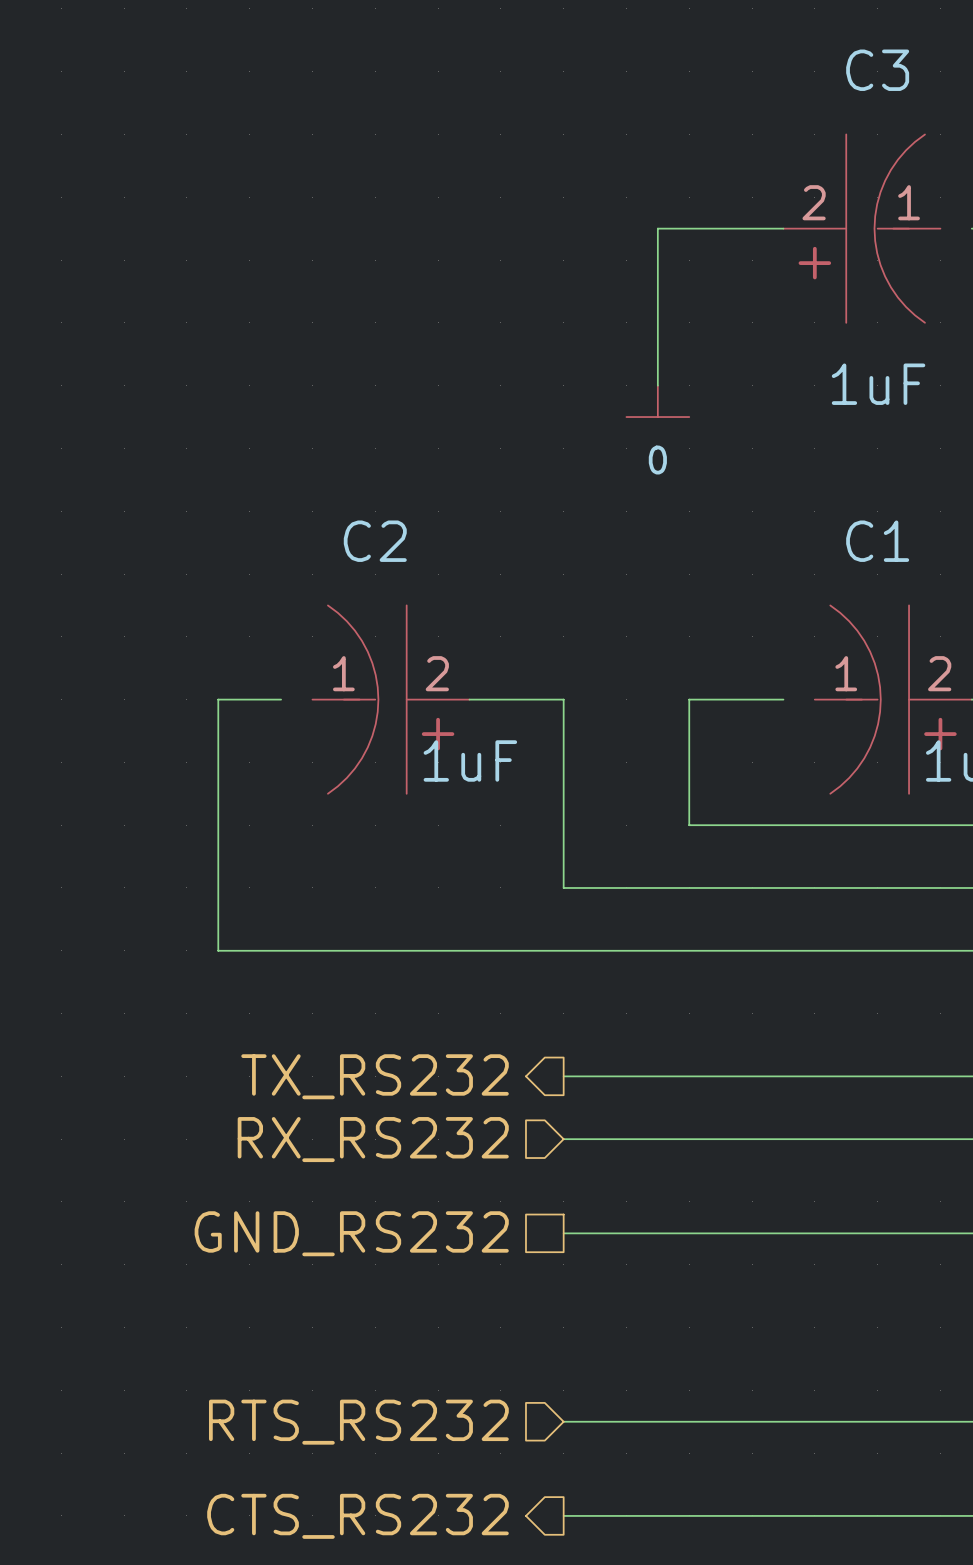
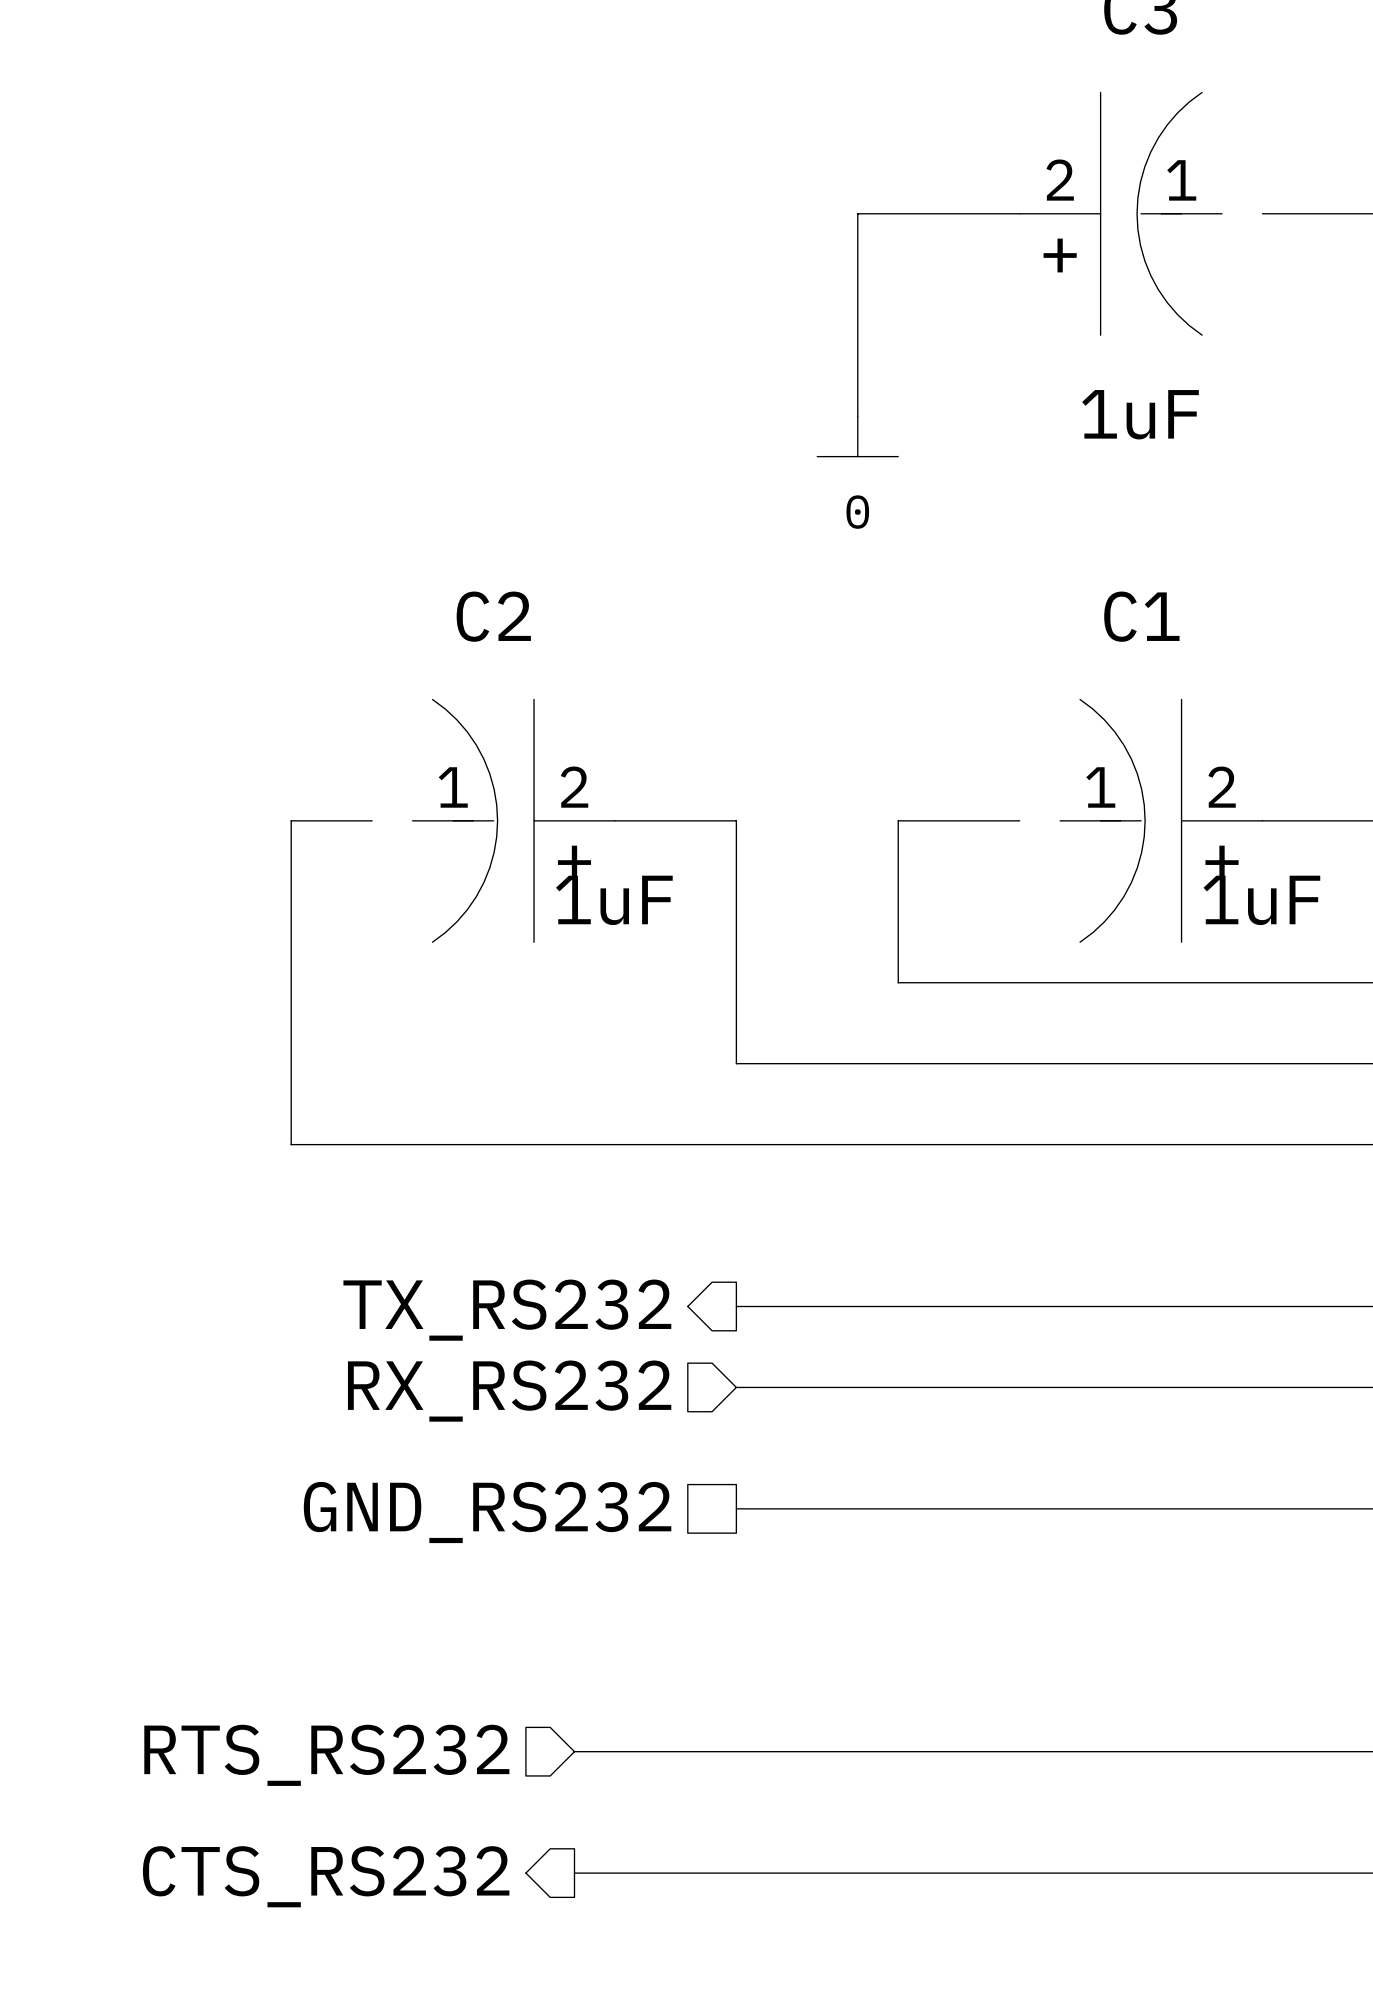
wire: none -> (574, 1751) (736, 1751)
hierarchical label position: RTS_RS232 (358, 1422) -> RTS_RS232 (326, 1755)
wire: none -> (574, 1873) (736, 1873)
hierarchical label position: CTS_RS232 (357, 1516) -> CTS_RS232 (326, 1876)

